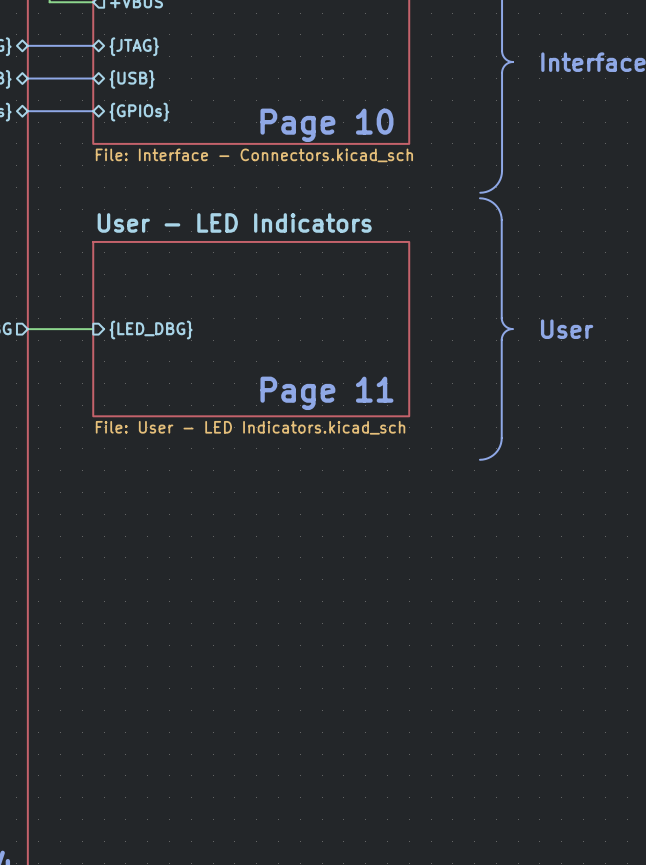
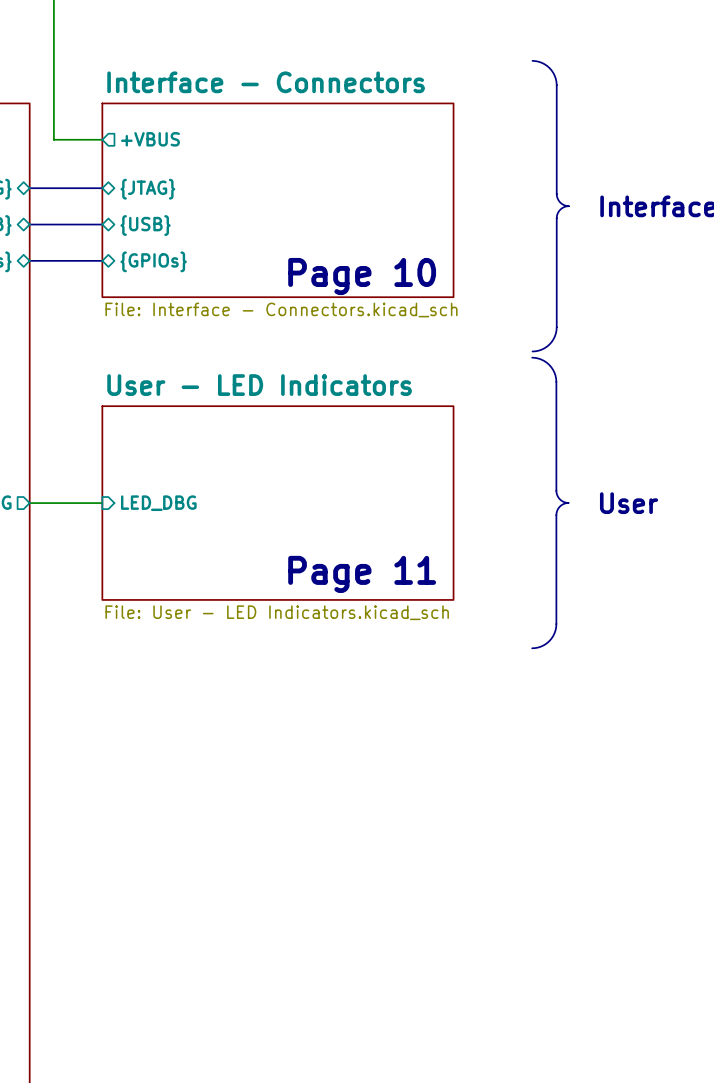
sheet pin: {LED_DBG} (151, 330) -> LED_DBG (158, 503)

